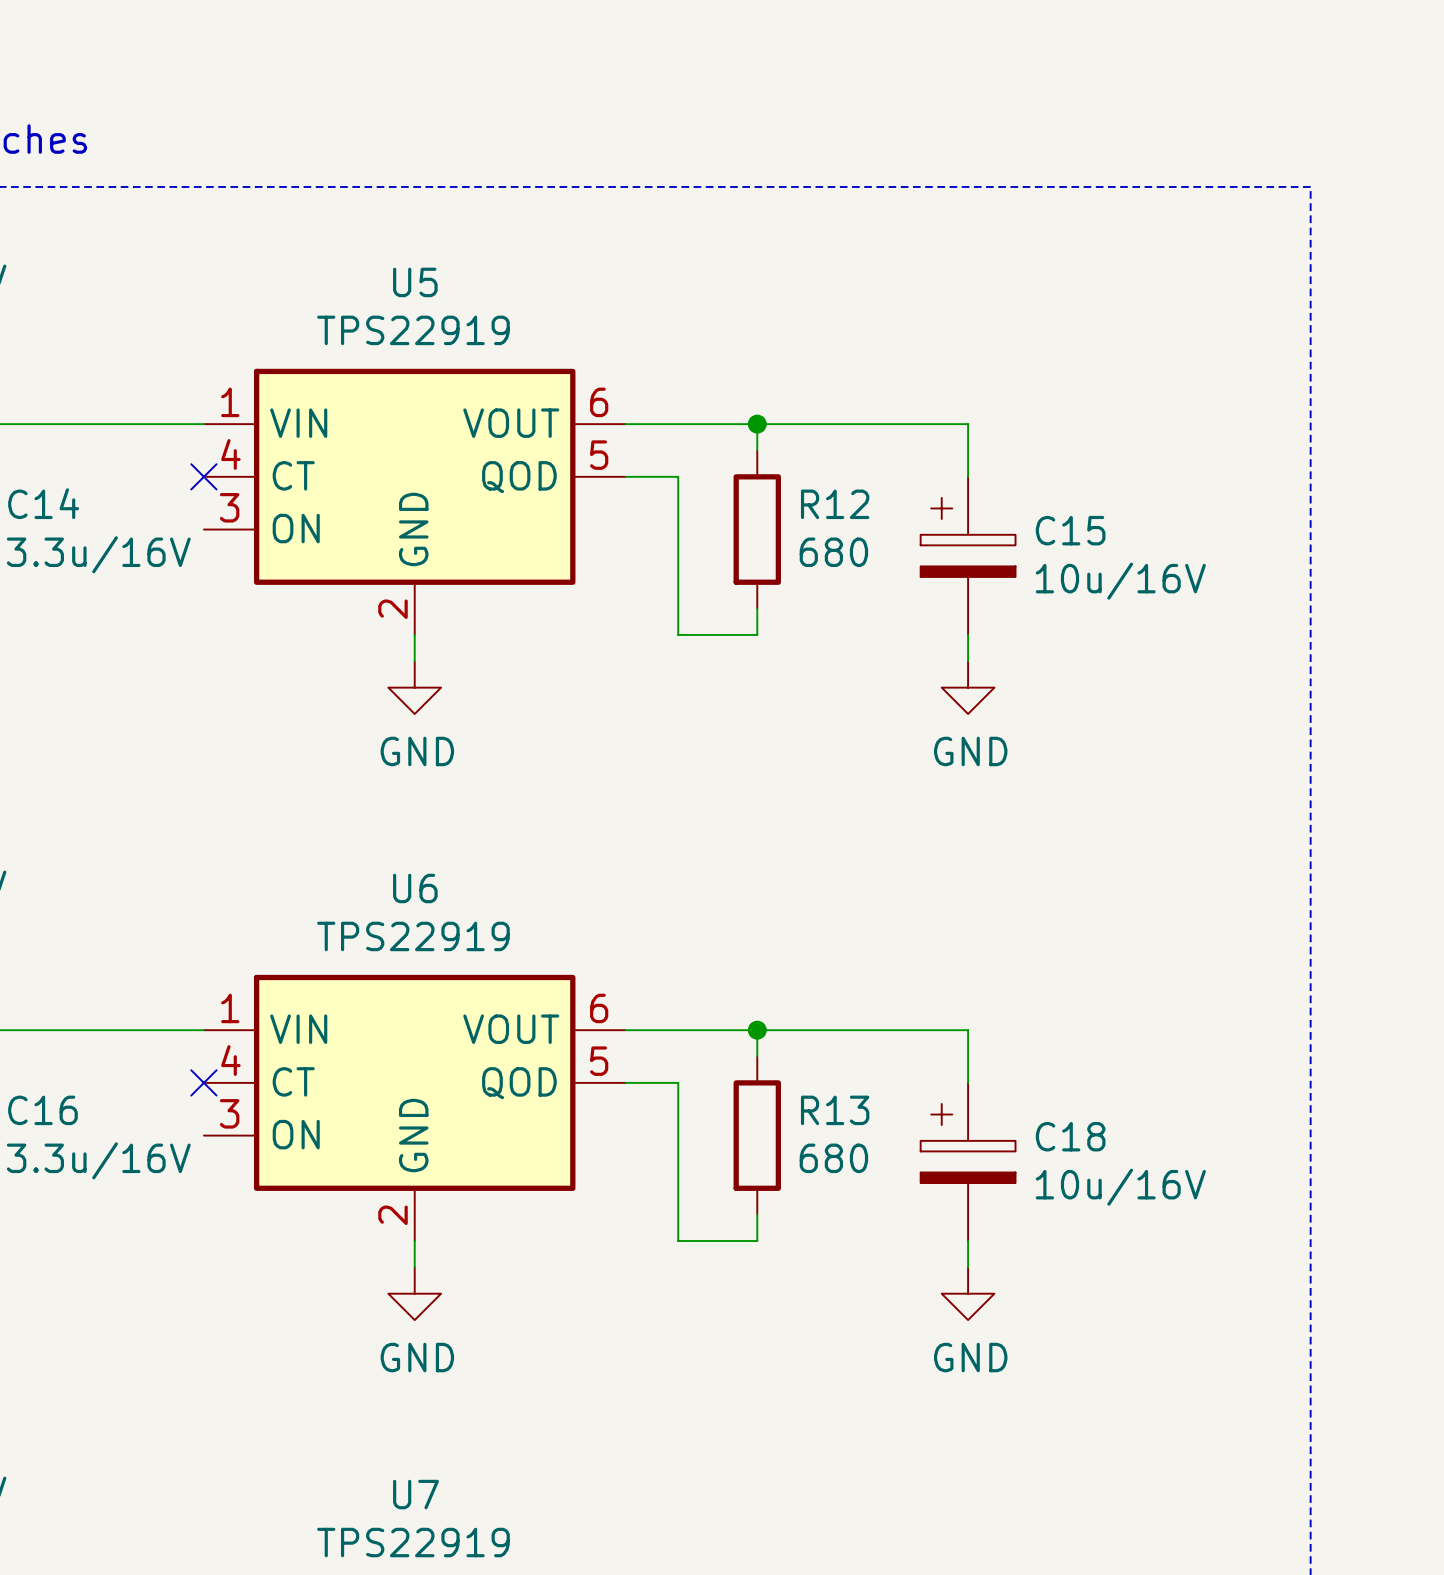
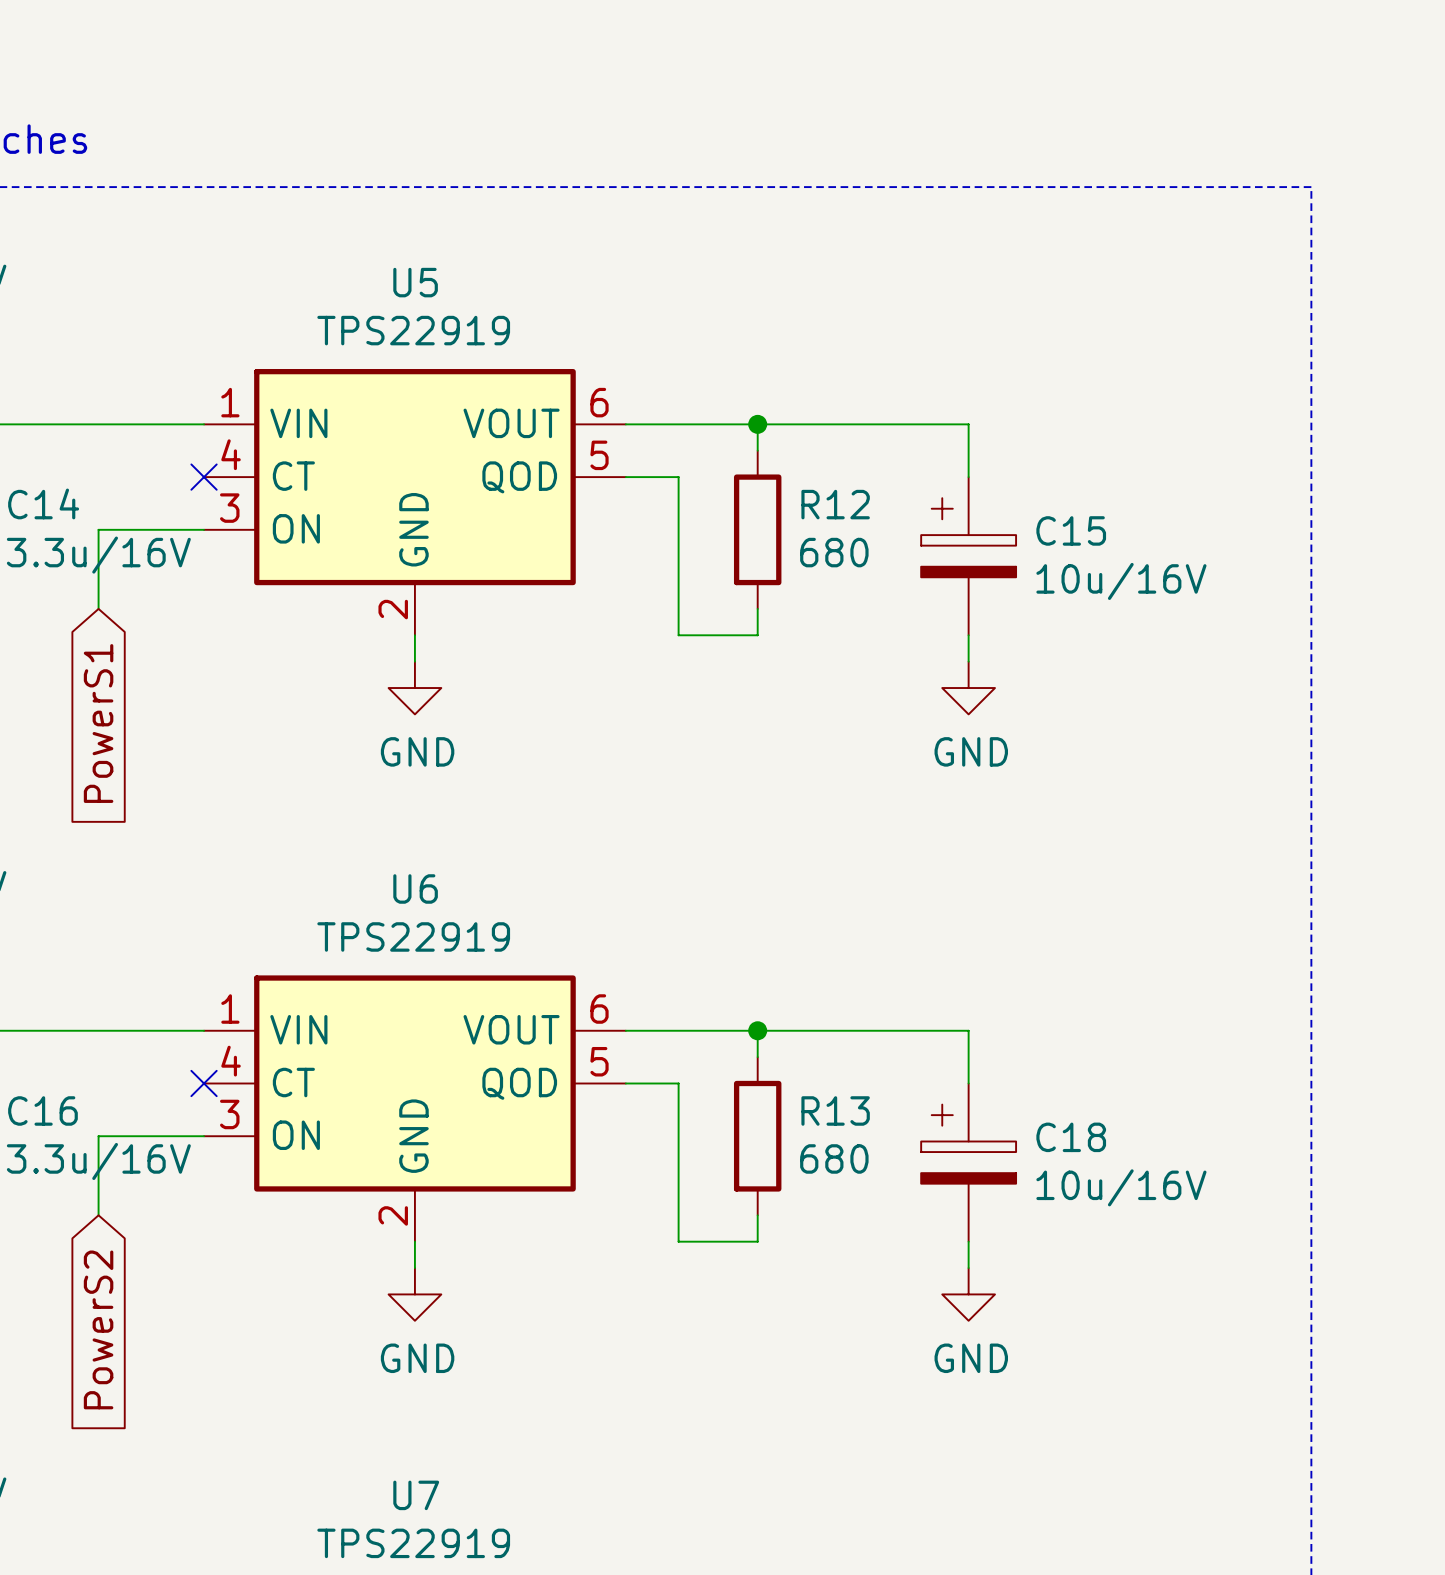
wire: none -> (204, 529) (98, 529) (98, 608)
global label: none -> PowerS1 (98, 723)
wire: none -> (204, 1136) (98, 1136) (98, 1215)
global label: none -> PowerS2 (98, 1329)

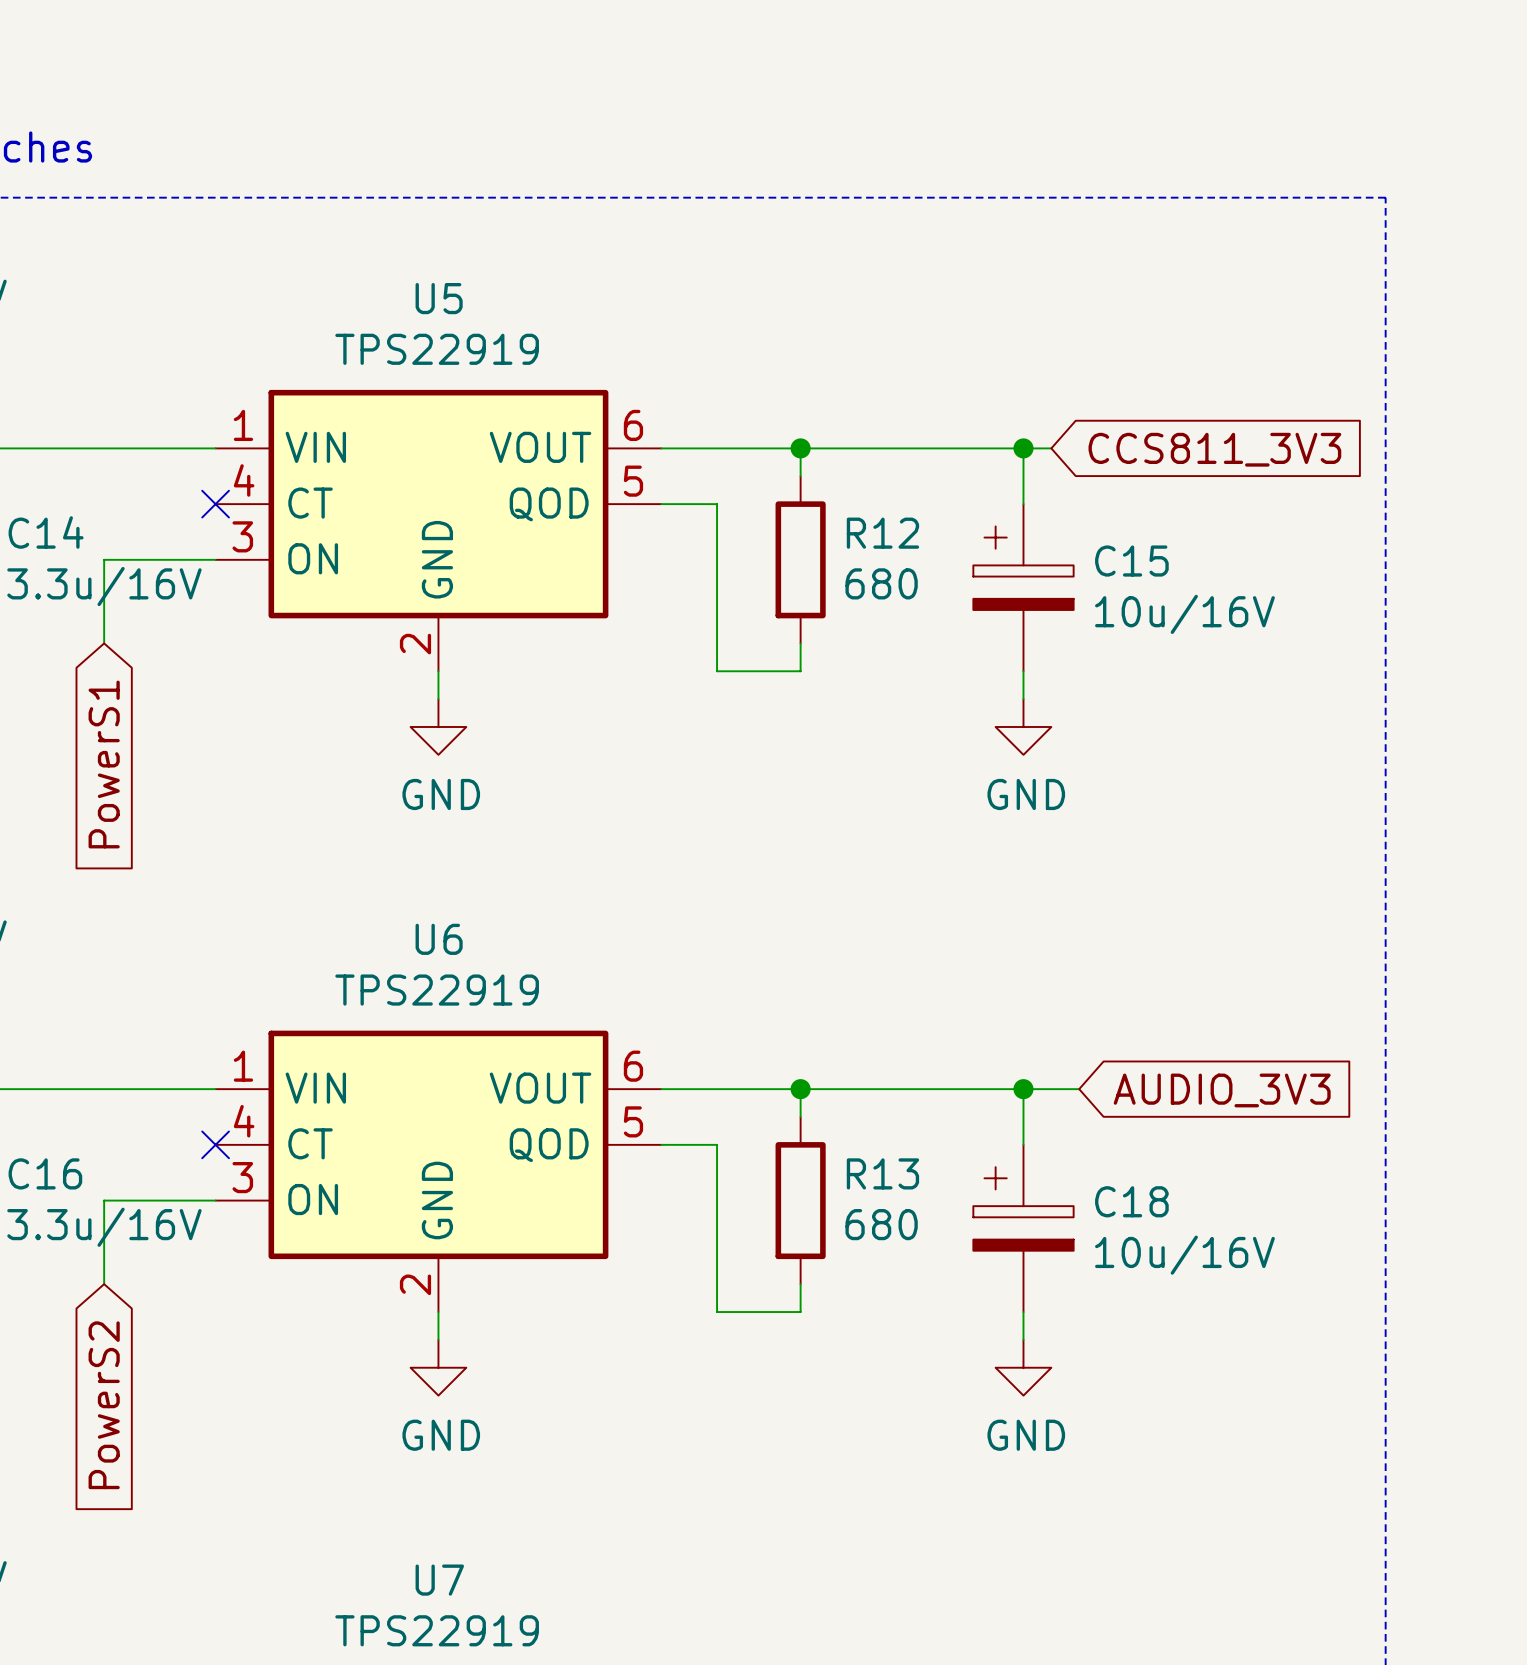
wire: none -> (1023, 448) (1051, 448)
junction: none -> (1023, 448)
global label: none -> CCS811_3V3 (1214, 449)
wire: none -> (1023, 1089) (1079, 1089)
junction: none -> (1023, 1089)
global label: none -> AUDIO_3V3 (1222, 1090)

